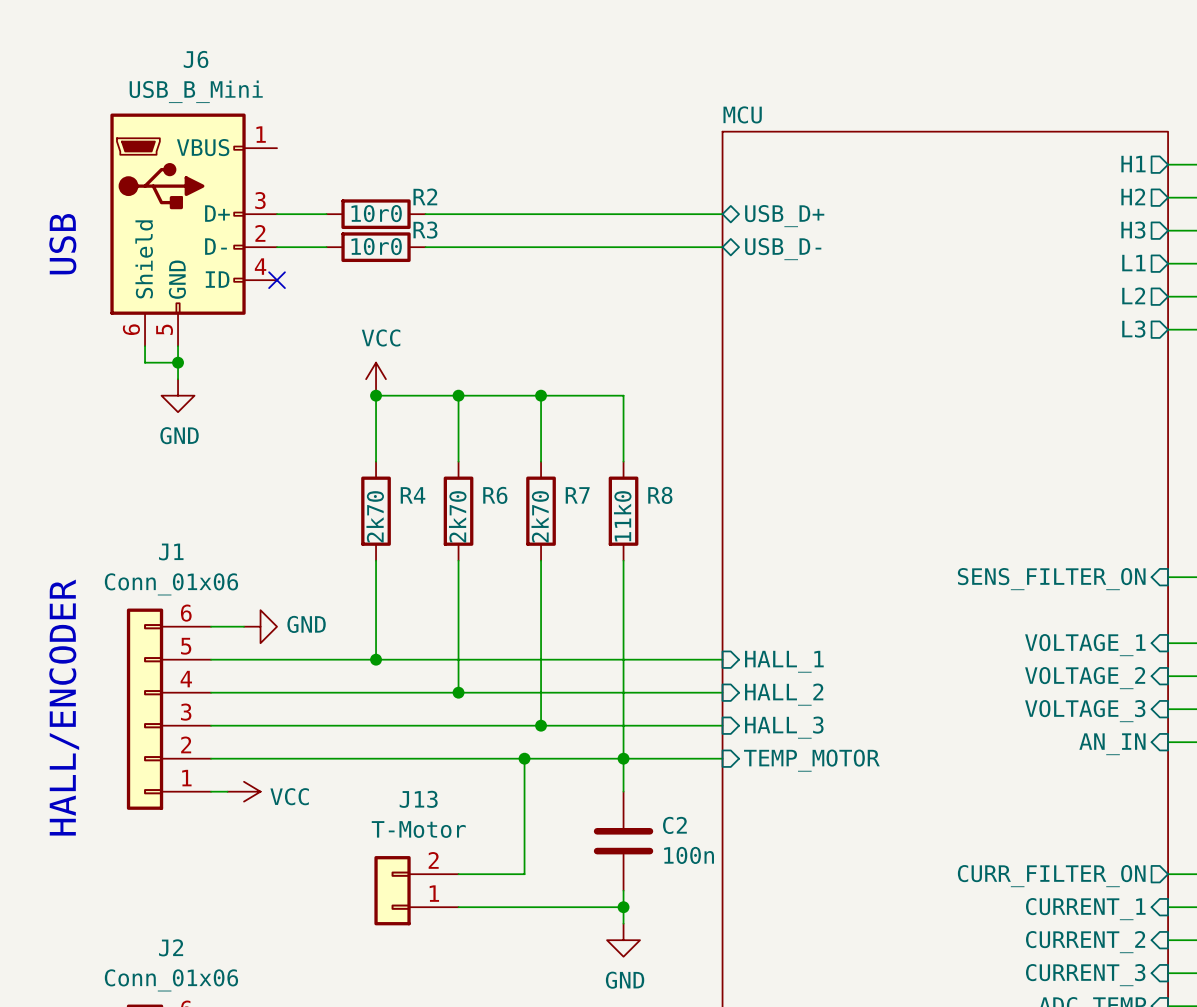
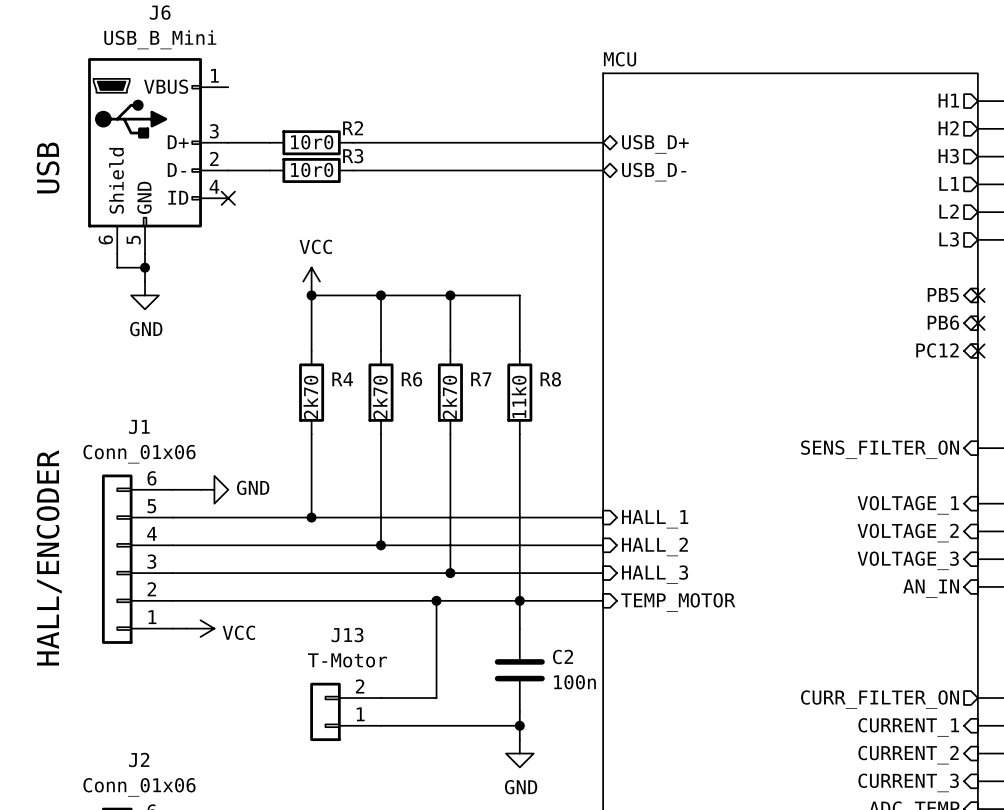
sheet pin: none -> PB5 (943, 295)
no-connect mark: none -> (977, 295)
sheet pin: none -> PB6 (943, 322)
no-connect mark: none -> (977, 323)
sheet pin: none -> PC12 (937, 350)
no-connect mark: none -> (977, 350)

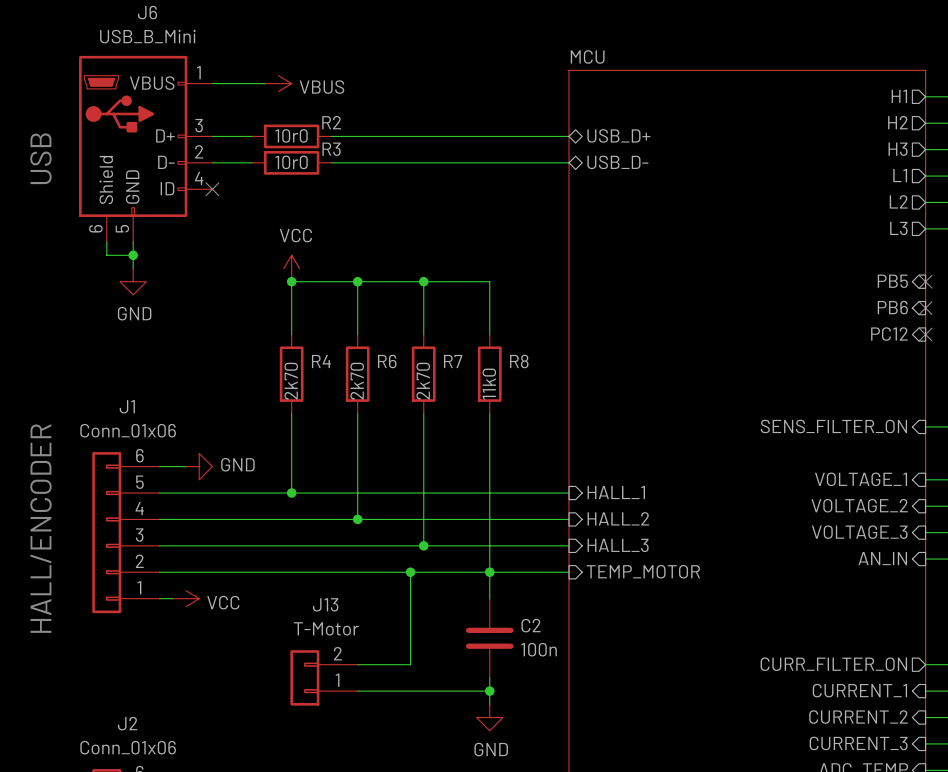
wire: none -> (212, 83) (265, 83)
power symbol: none -> VBUS (278, 83)

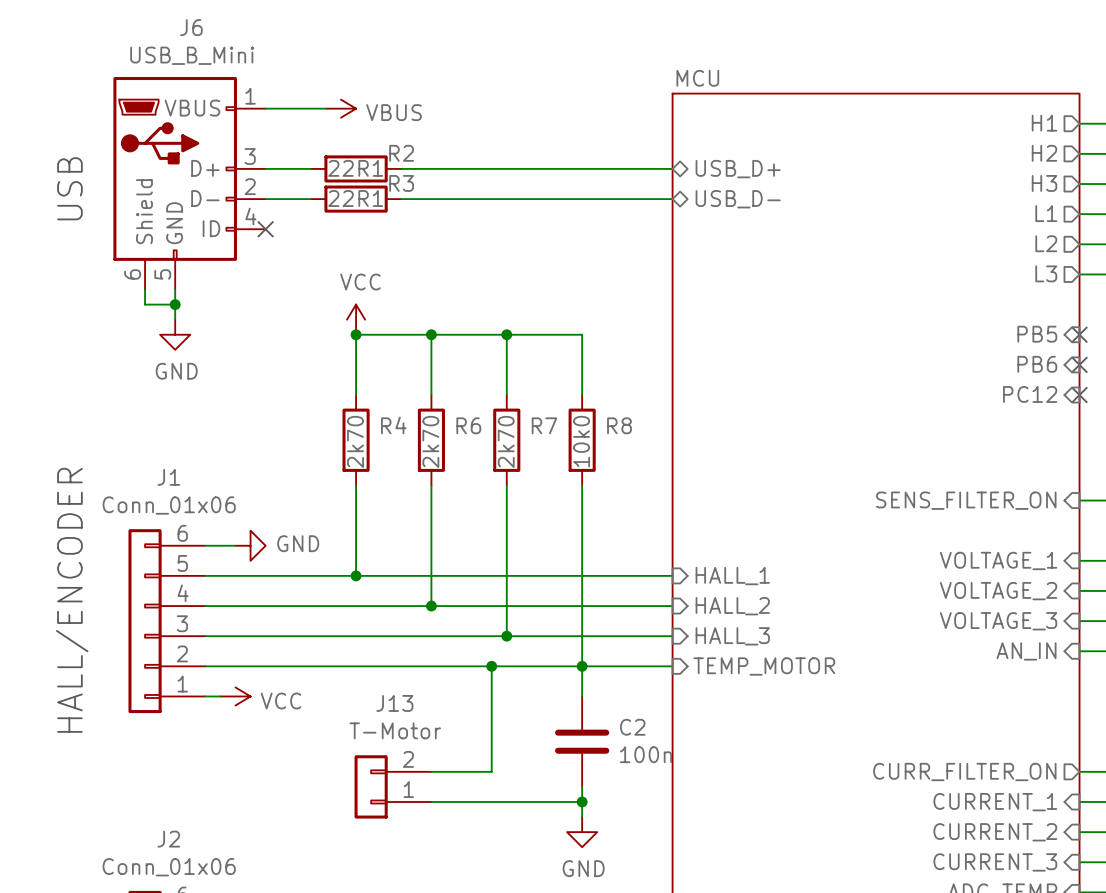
R2 value: 10r0 (291, 135) -> 22R1 (355, 168)
R3 value: 10r0 (291, 162) -> 22R1 (355, 198)
R8 value: 11k0 (489, 384) -> 10k0 (581, 441)

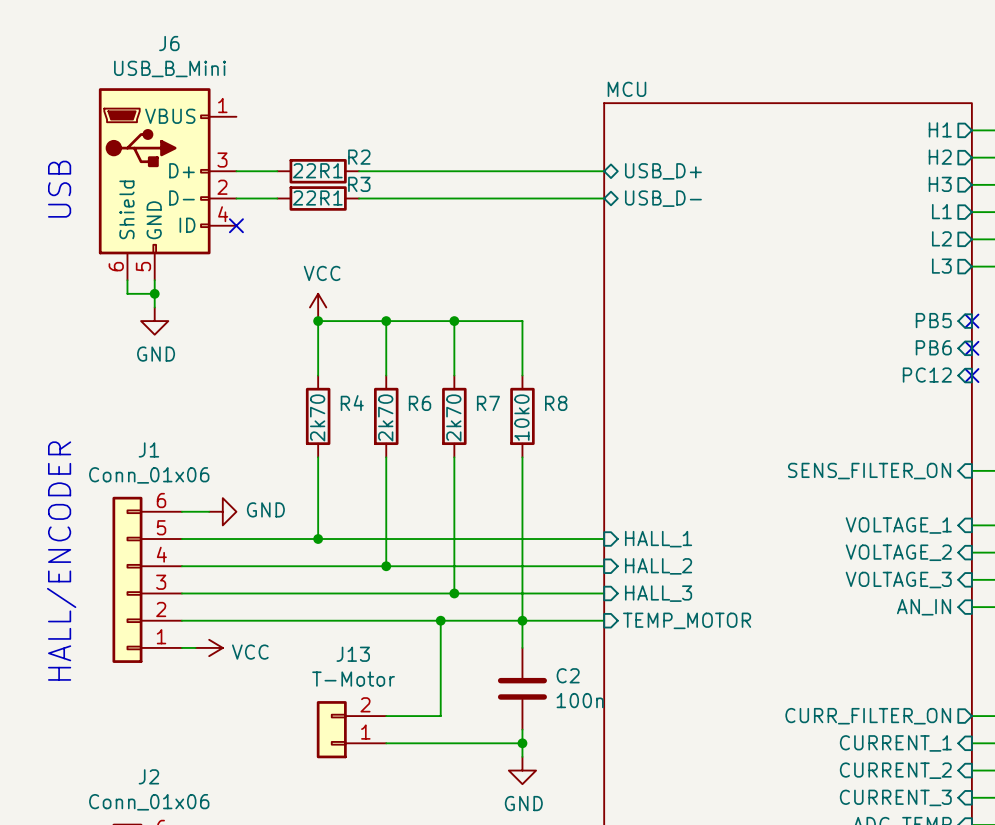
wire: (265, 108) (325, 108) -> none
power symbol: VBUS (340, 108) -> none

